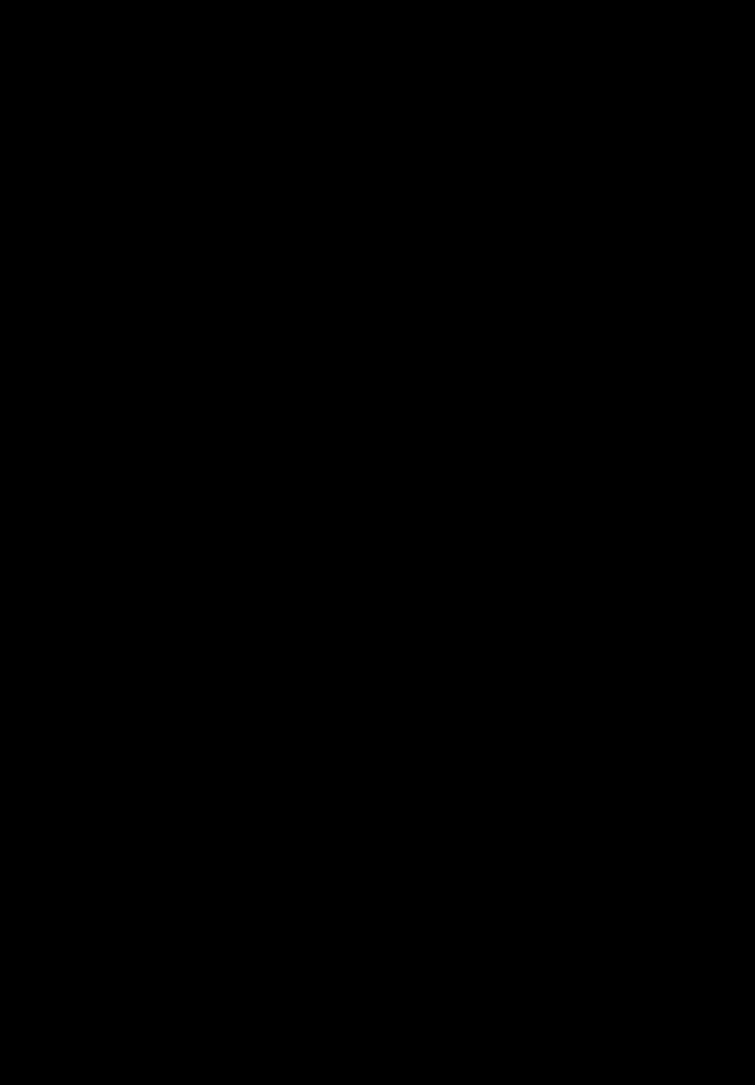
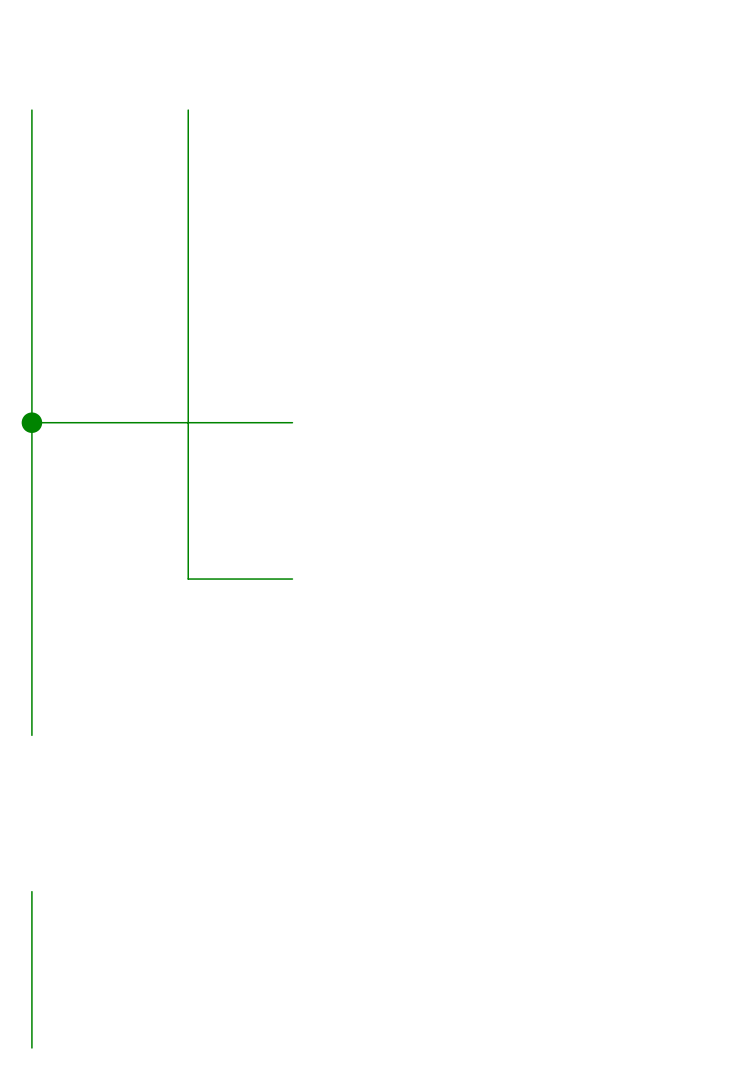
wire: none -> (31, 110) (31, 735)
wire: none -> (188, 110) (188, 579) (292, 579)
wire: none -> (31, 422) (292, 422)
junction: none -> (31, 422)
wire: none -> (31, 891) (31, 1047)

